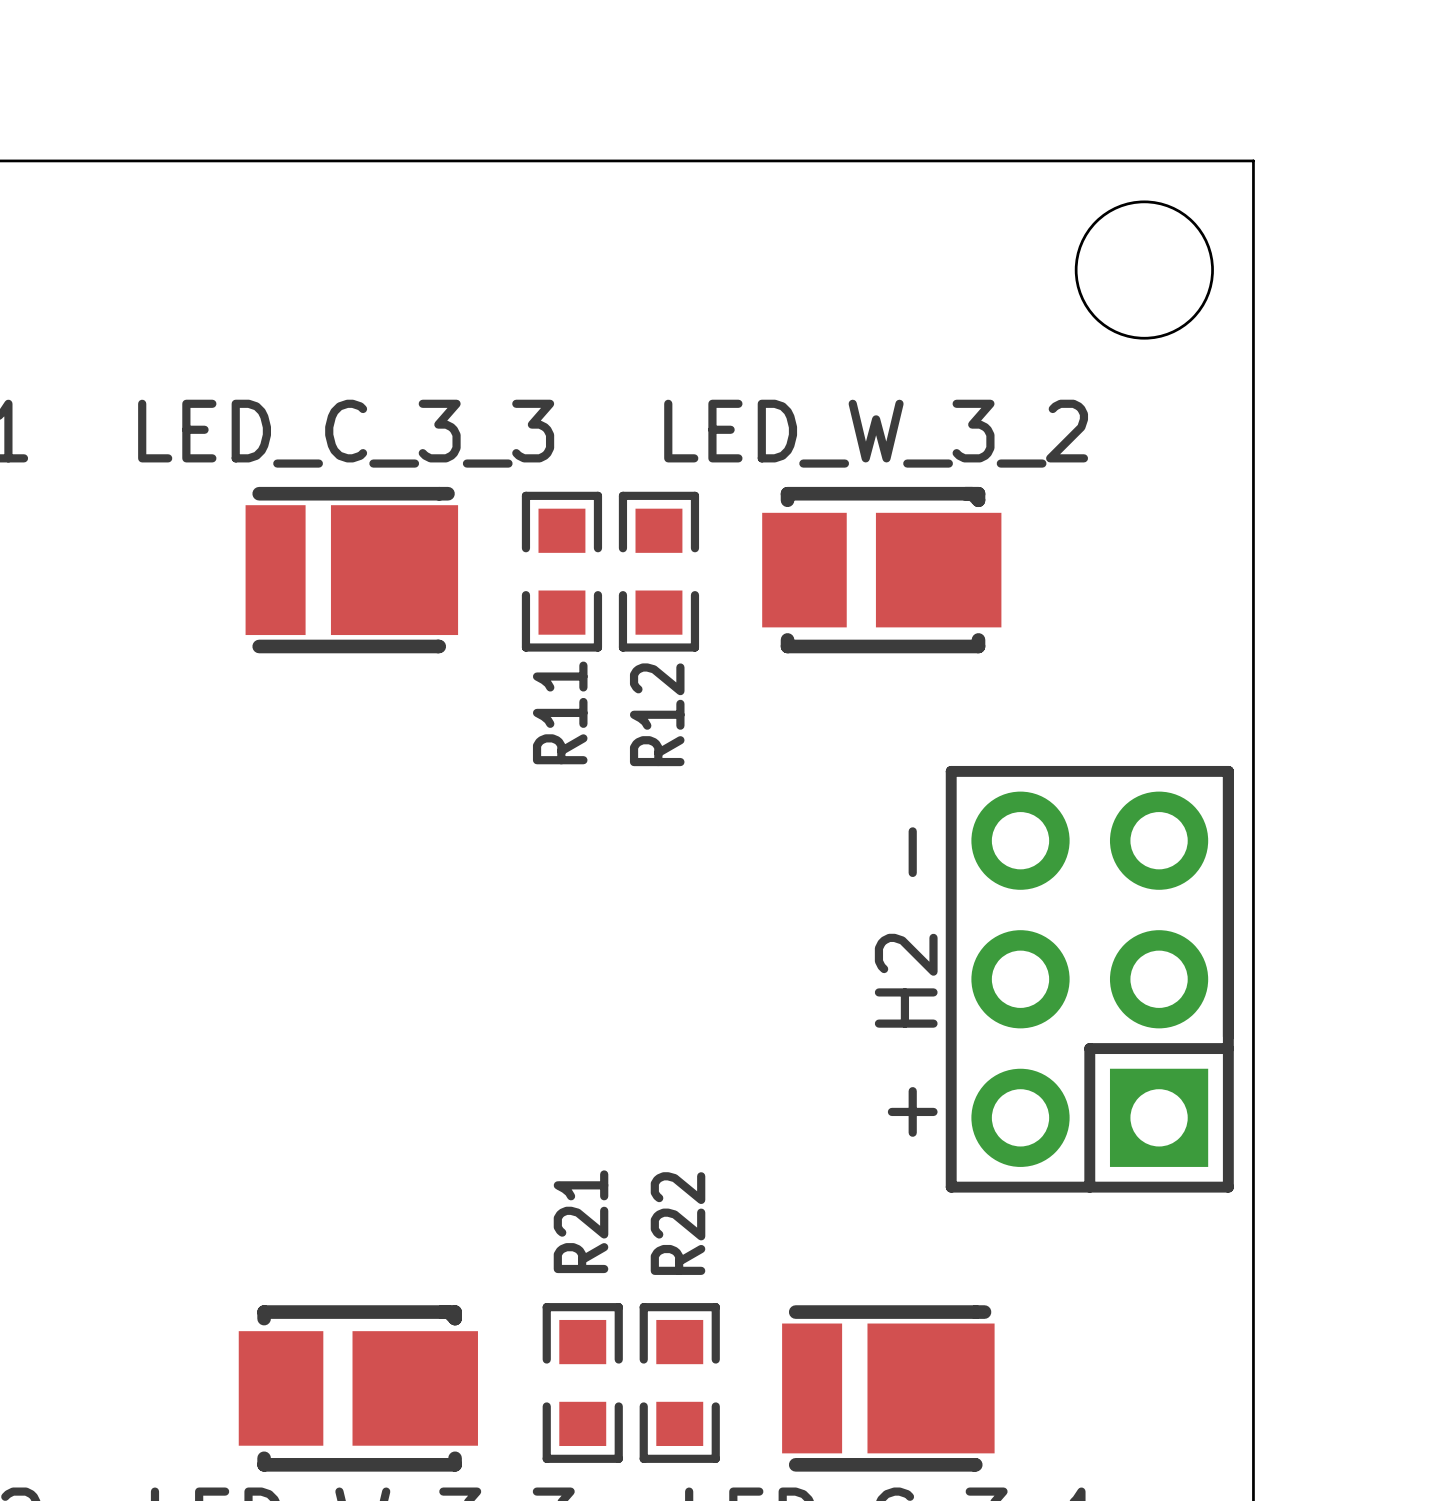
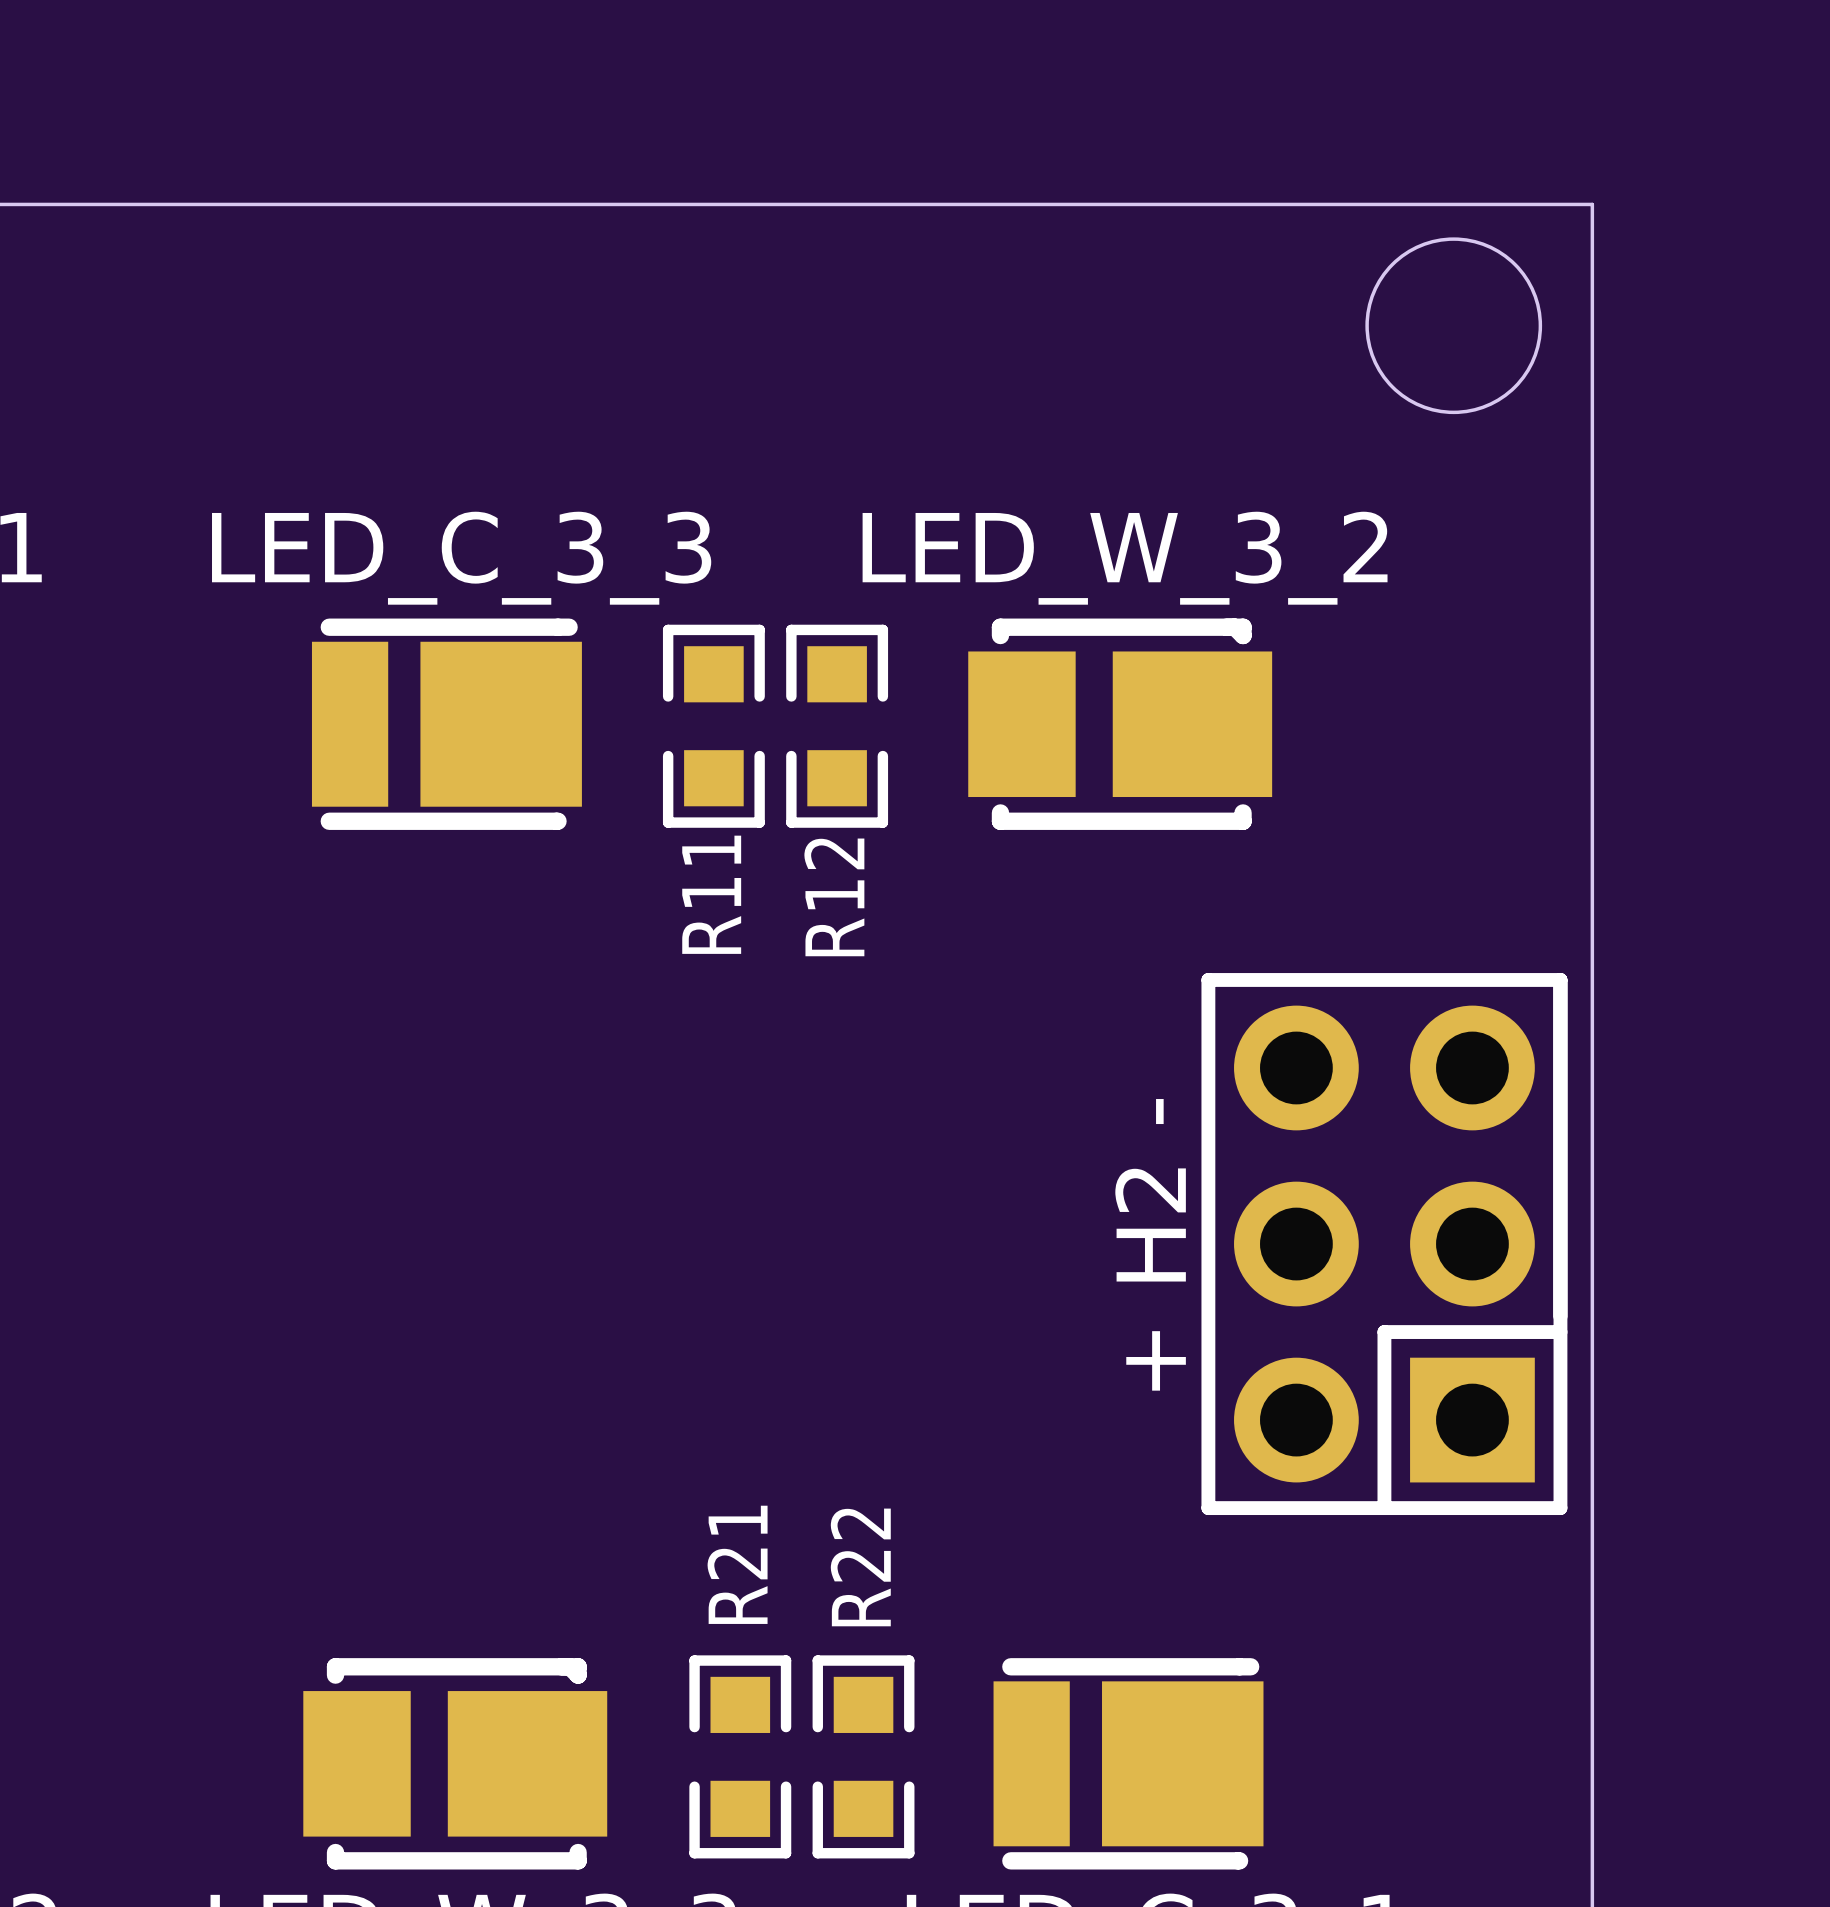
round board edge position: (1144, 270) -> (1453, 325)

